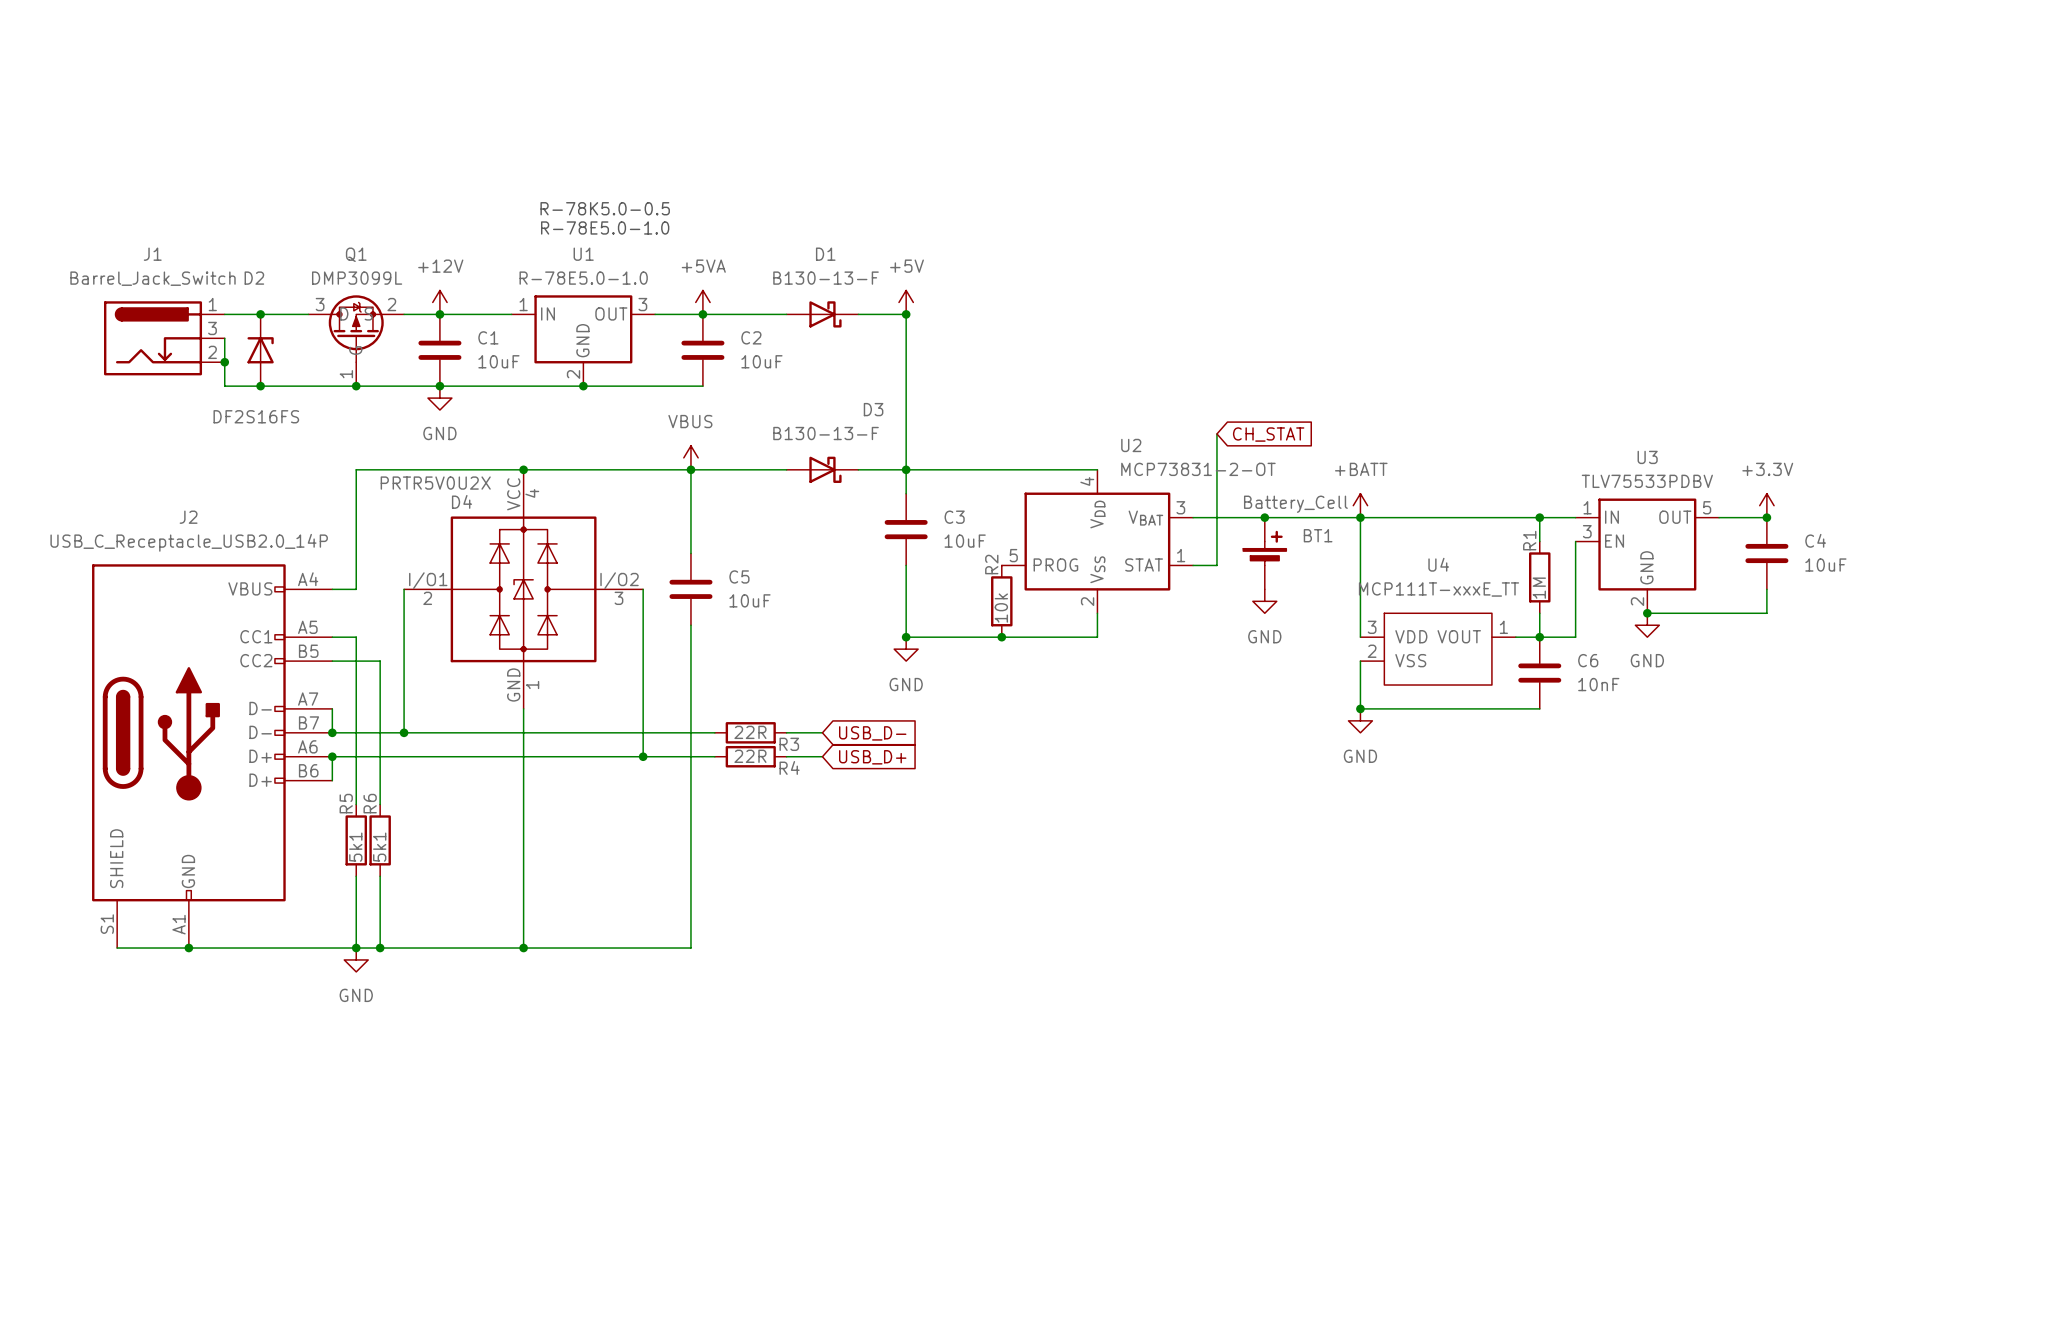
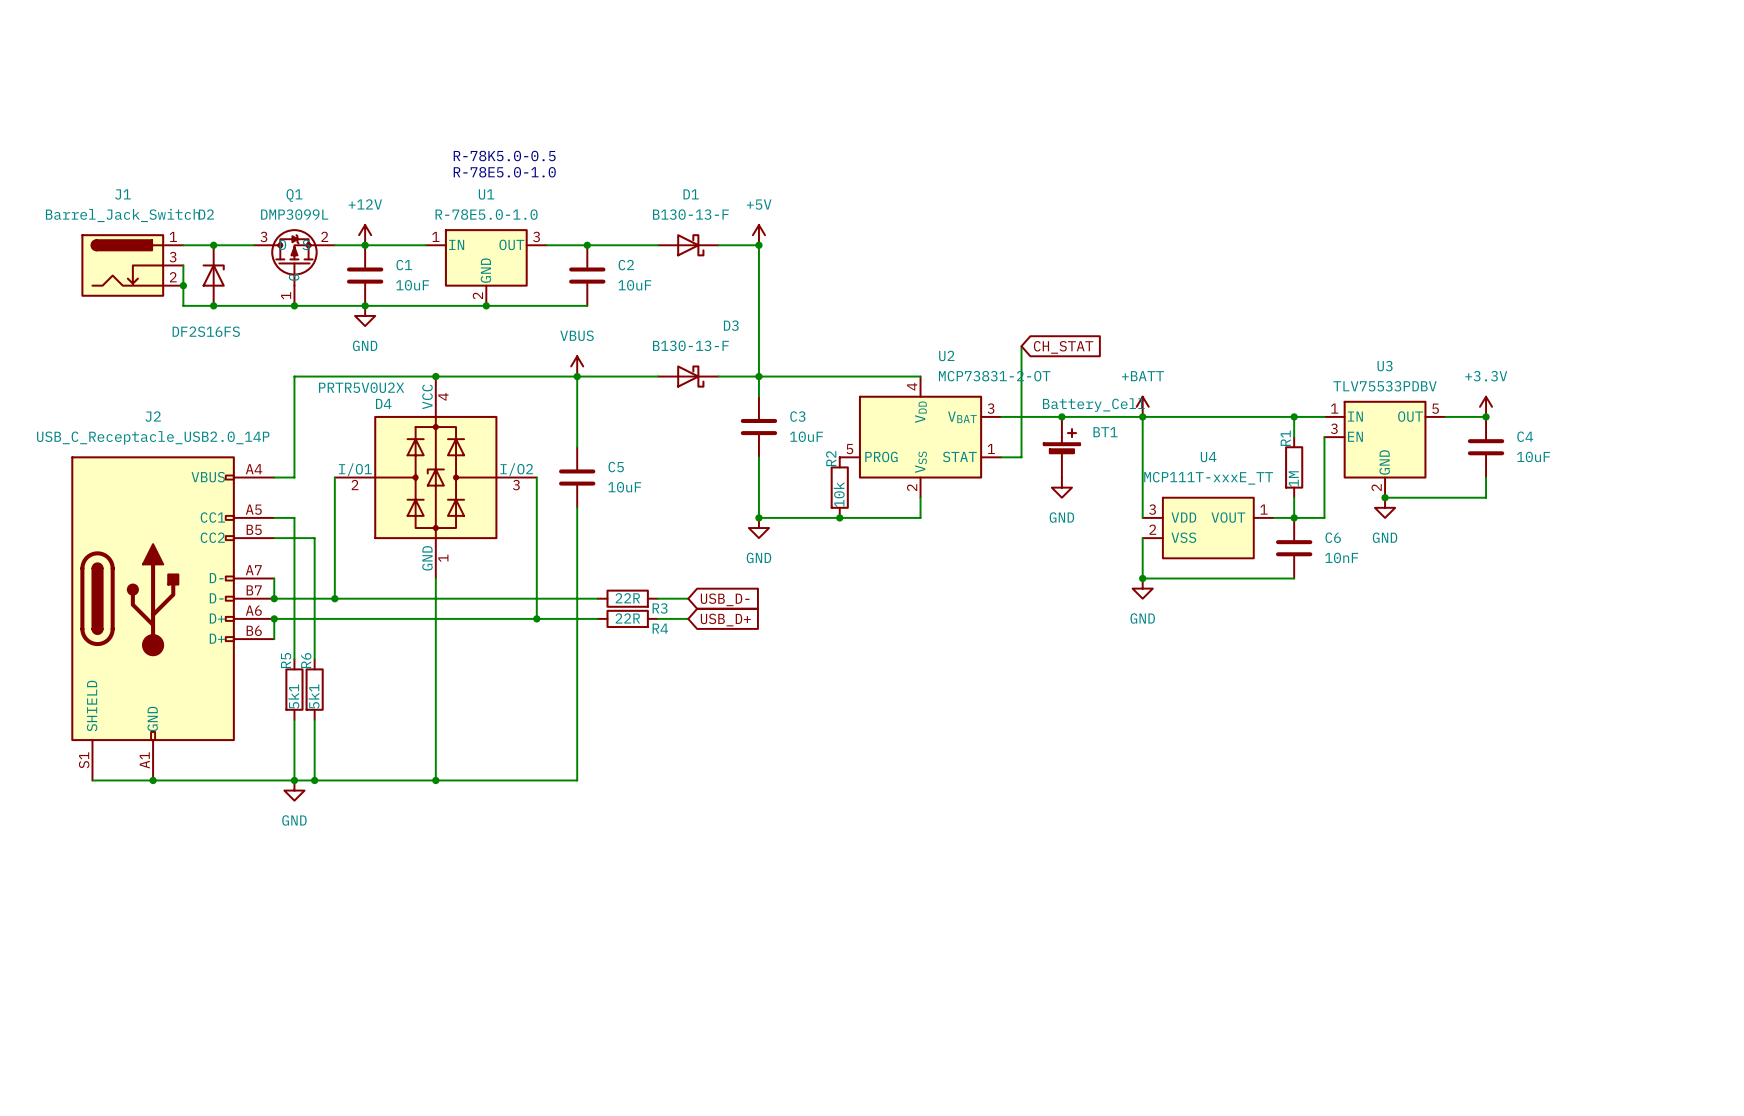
power symbol: +5VA (702, 302) -> none

